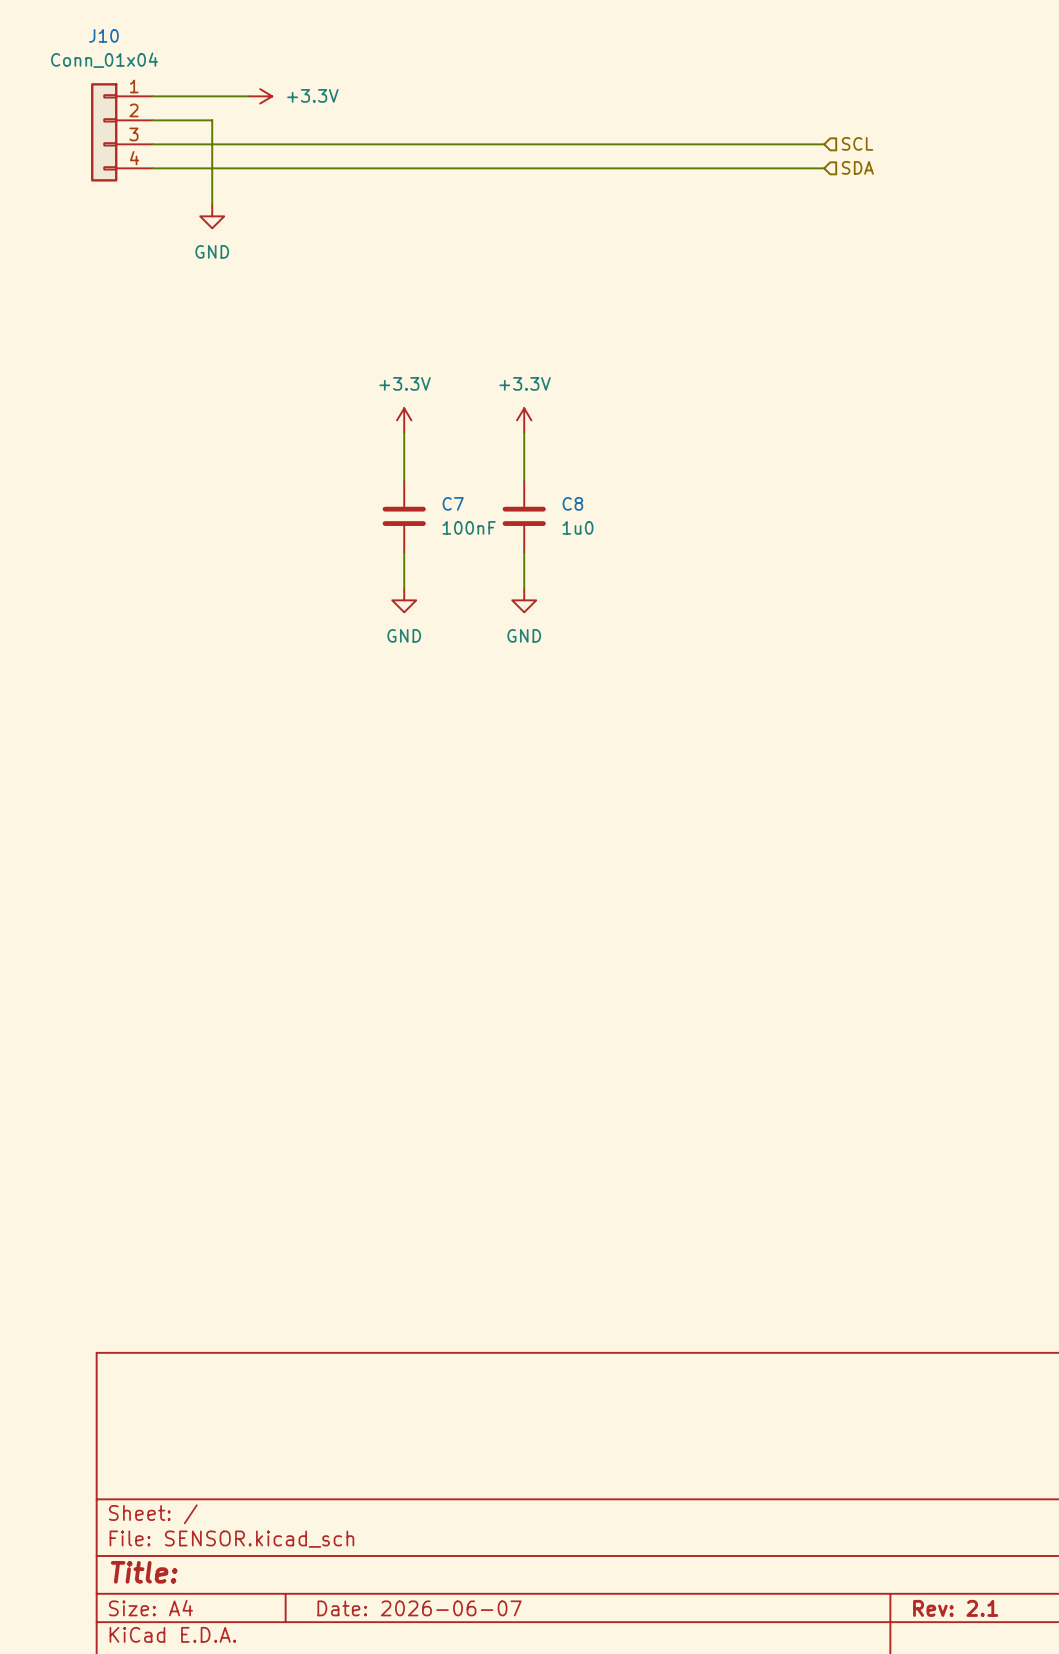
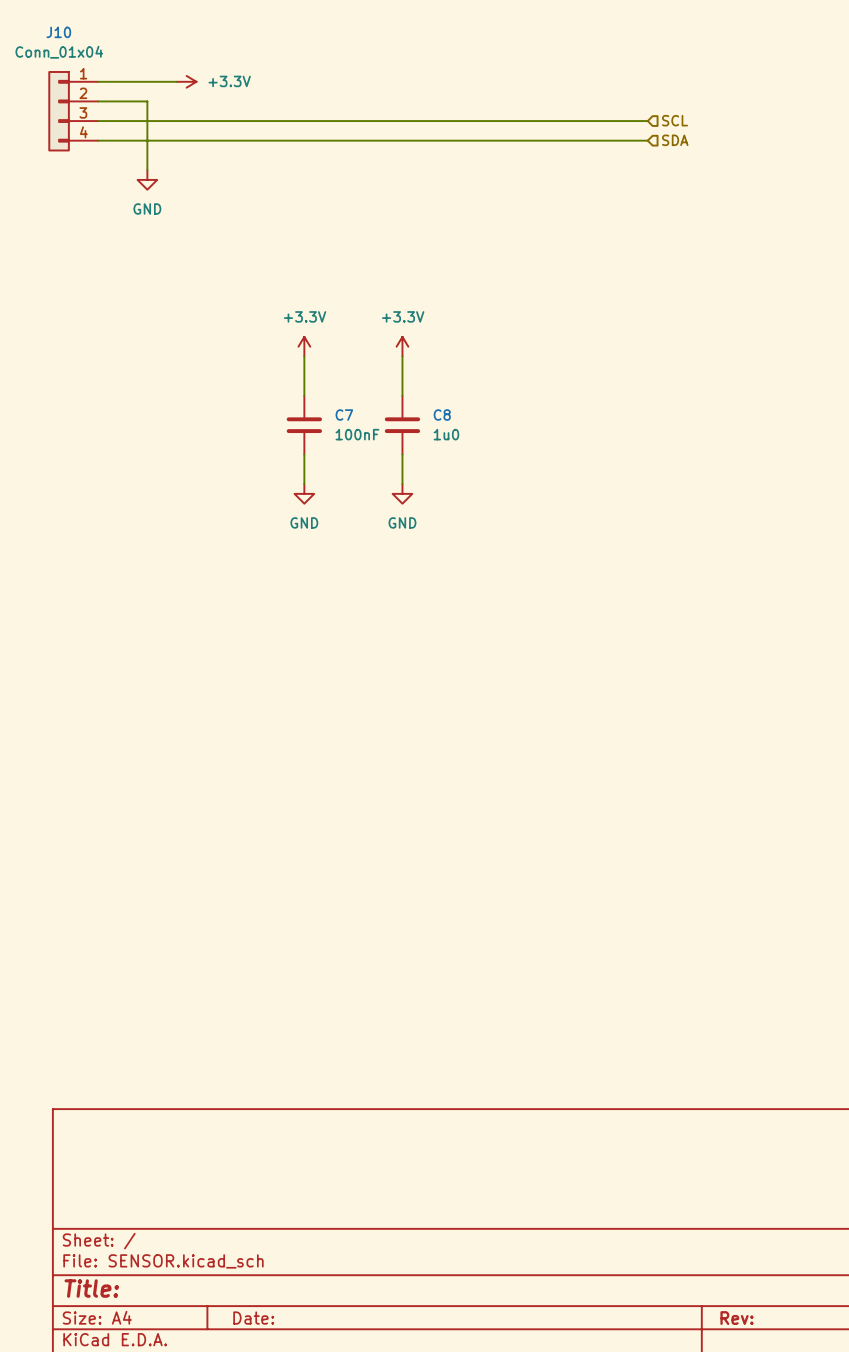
title block: Date: 2026-06-07 (419, 1608) -> Date: (253, 1318)
title block: Rev: 2.1 (955, 1608) -> Rev: (737, 1318)

